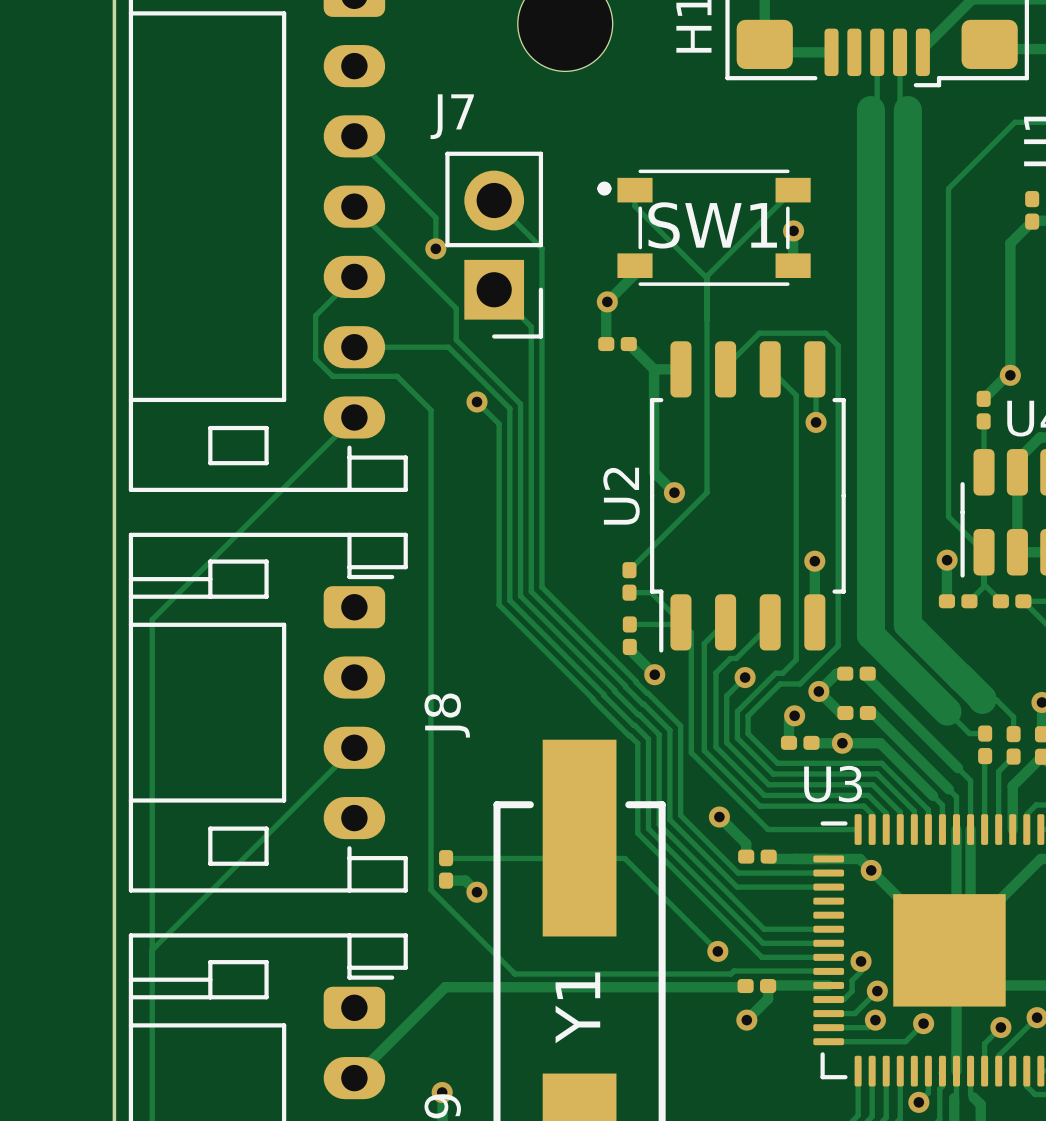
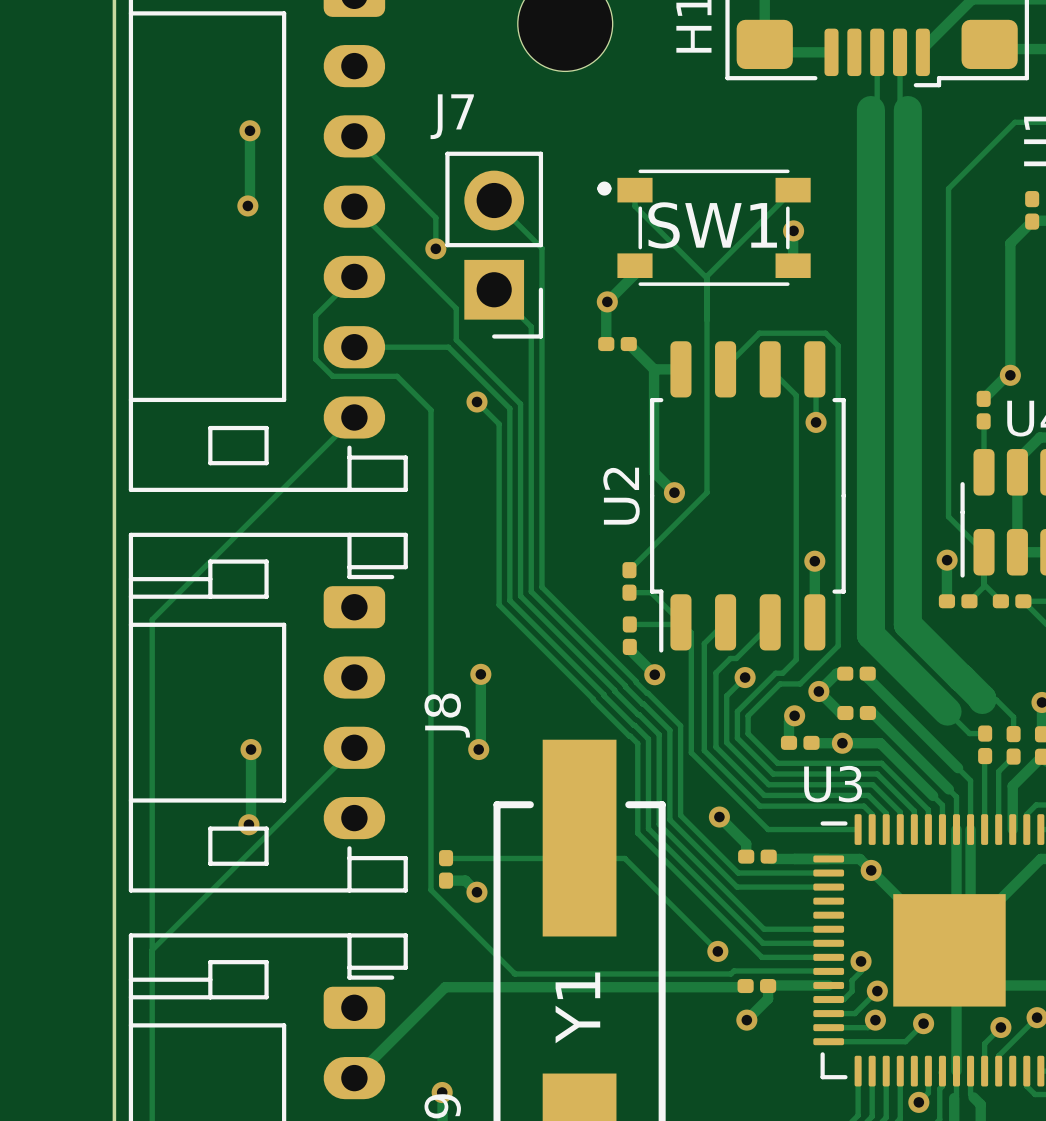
track: none -> (249, 130) (249, 203)
via: none -> (249, 130)
via: none -> (247, 205)
track: none -> (480, 674) (480, 747)
via: none -> (480, 674)
track: none -> (251, 749) (251, 822)
via: none -> (251, 749)
via: none -> (478, 749)
via: none -> (248, 824)

